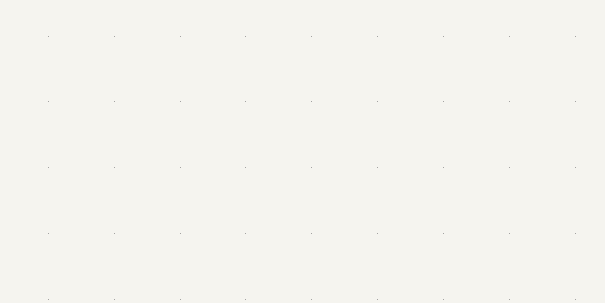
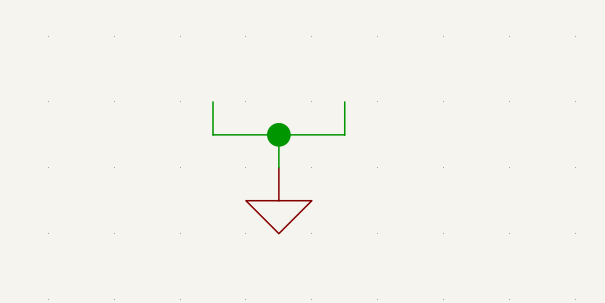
wire: none -> (213, 101) (213, 134) (344, 134) (344, 101)
wire: none -> (278, 134) (278, 167)
junction: none -> (278, 134)
power symbol: none -> (278, 200)

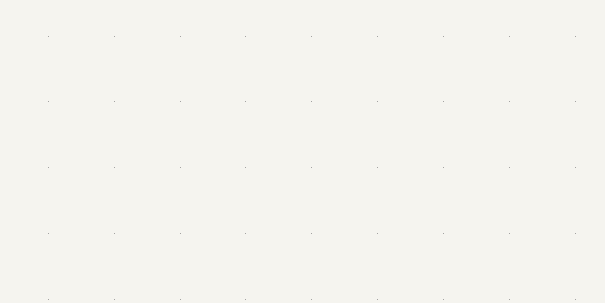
wire: (213, 101) (213, 134) (344, 134) (344, 101) -> none
wire: (278, 134) (278, 167) -> none
junction: (278, 134) -> none
power symbol: (278, 200) -> none

